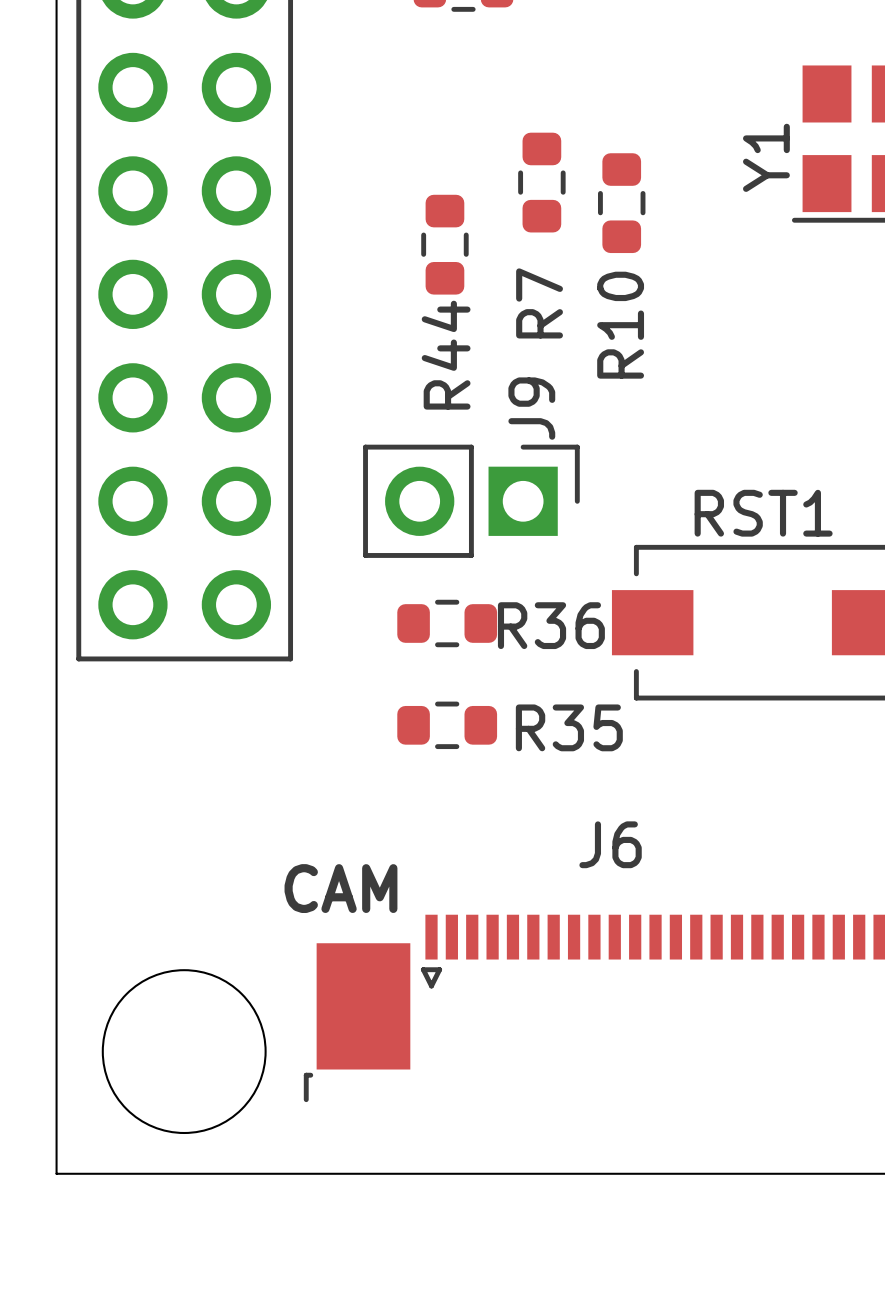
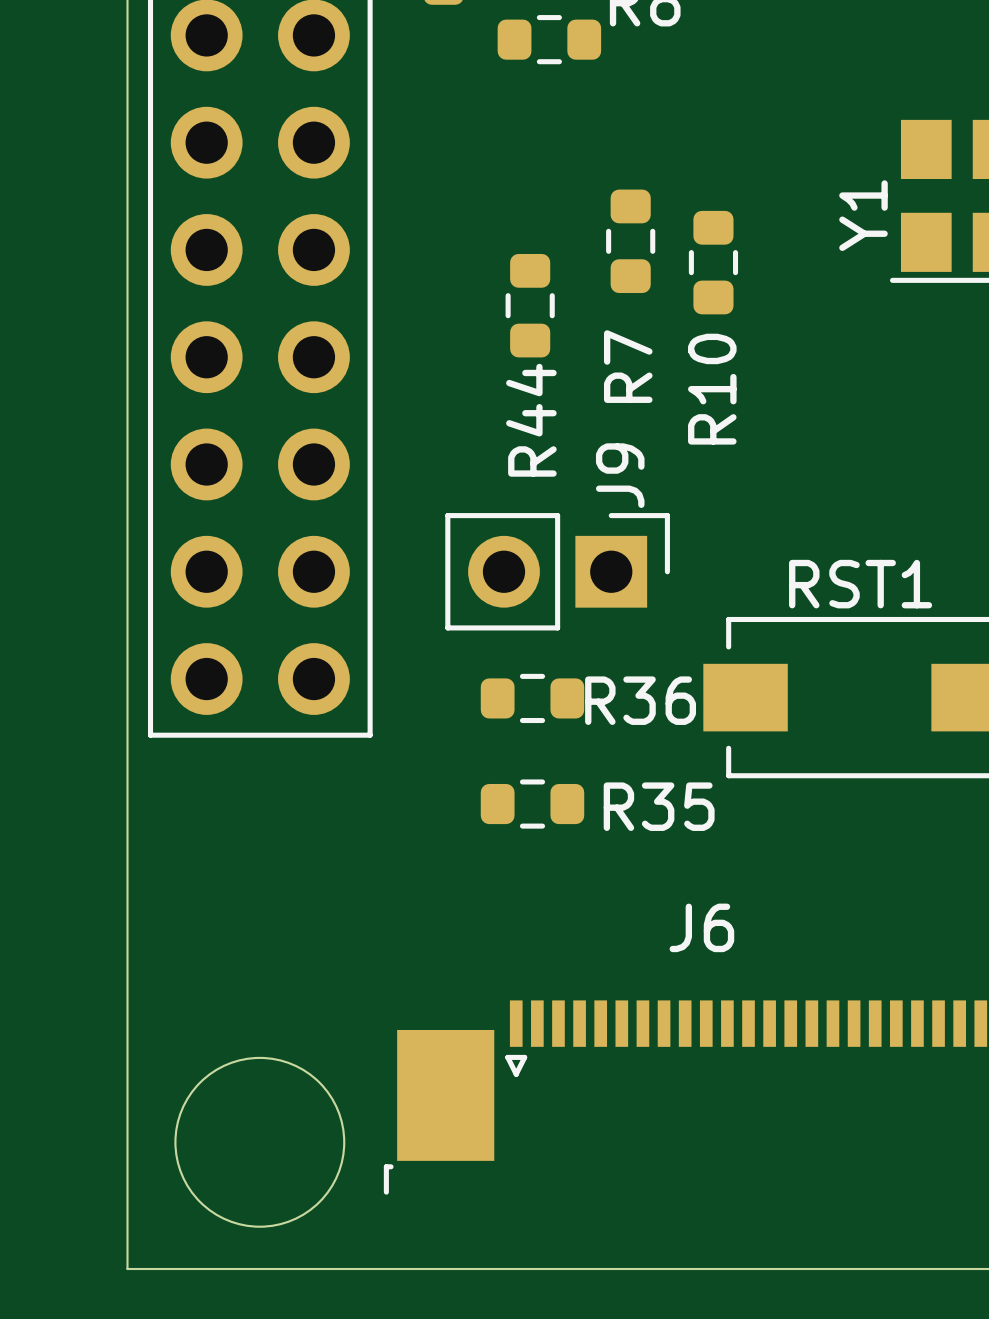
text: CAM (340, 888) -> none

